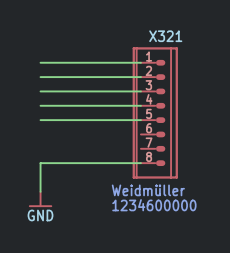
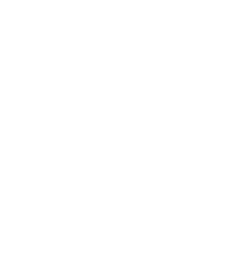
wire: (40, 62) (140, 62) -> none
wire: (40, 77) (140, 77) -> none
wire: (40, 91) (140, 91) -> none
wire: (40, 105) (140, 105) -> none
X321: (155, 112) -> none
wire: (40, 120) (140, 120) -> none
wire: (140, 163) (40, 163) (40, 191) -> none
text: Weidmüller (148, 190) -> none
power symbol: GND (40, 199) -> none
text: 1234600000 (154, 205) -> none

